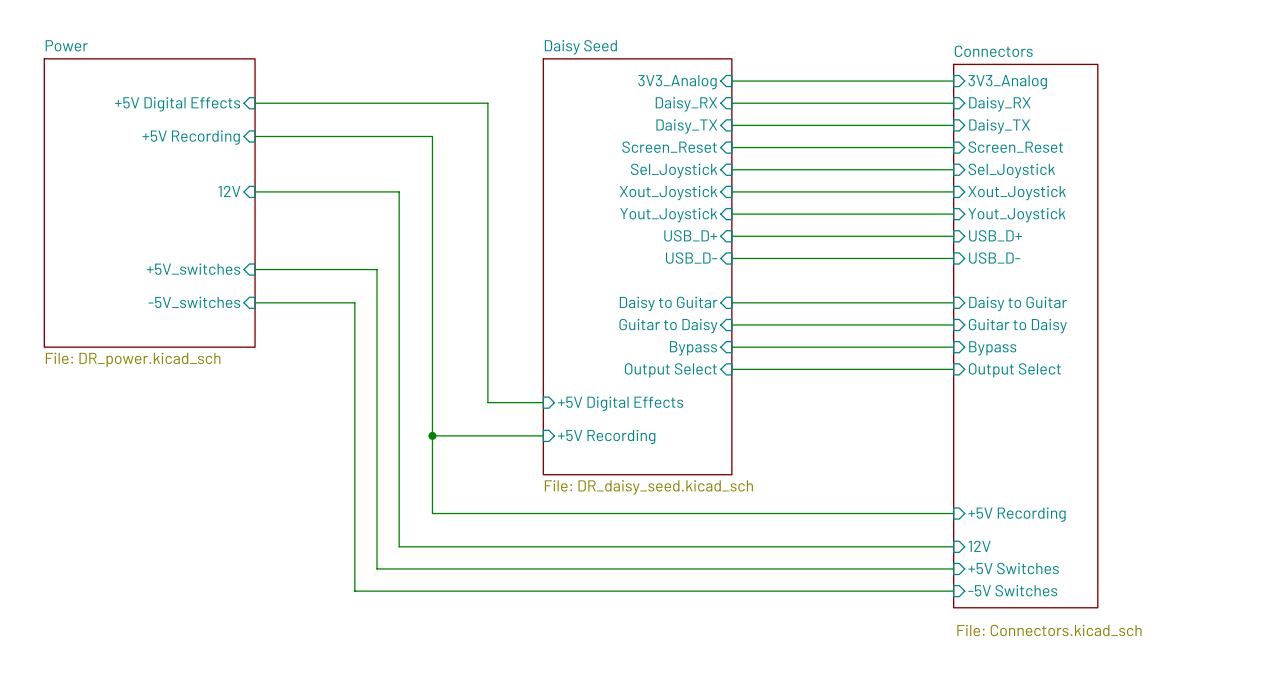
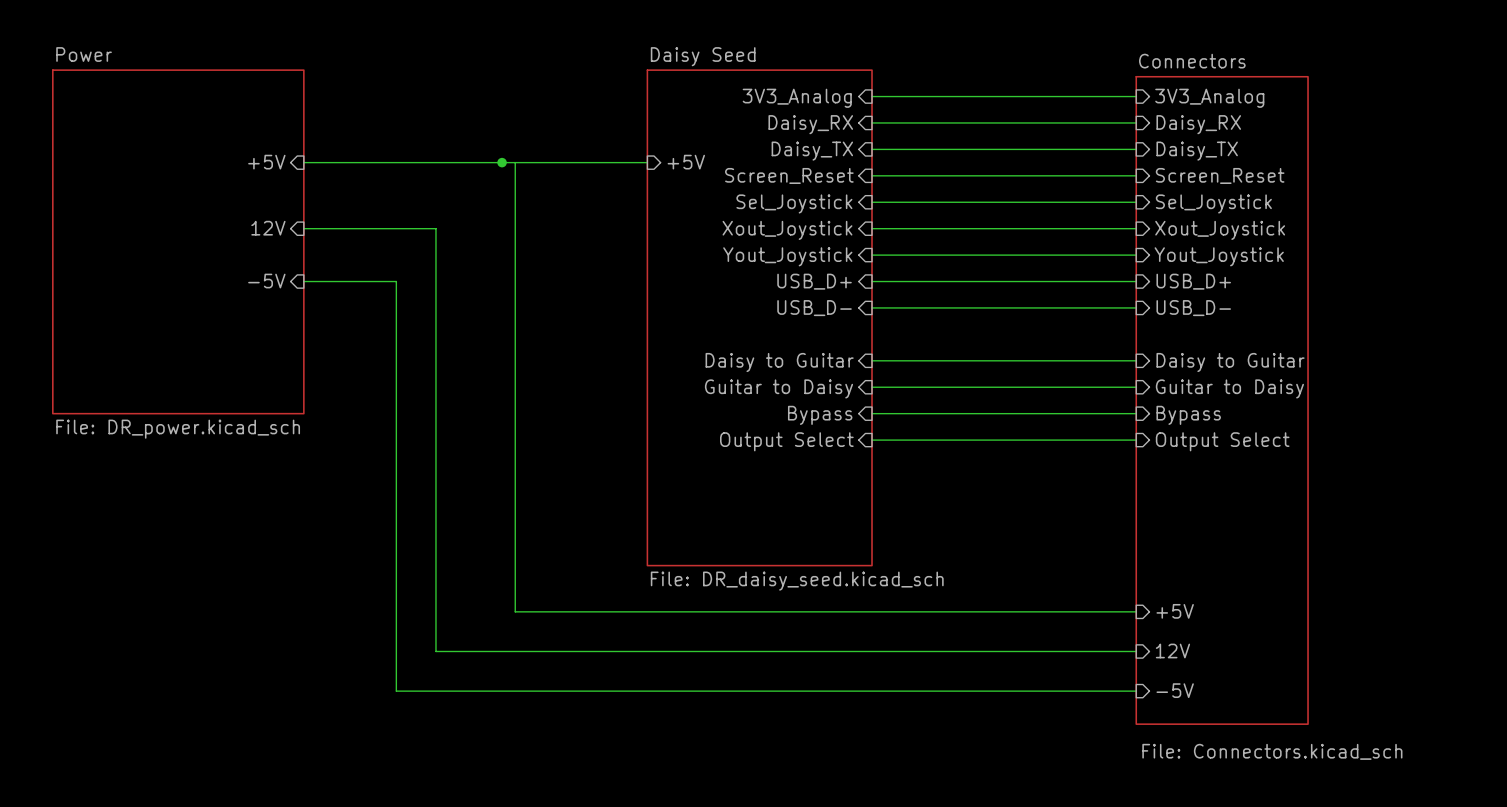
wire: (255, 103) (487, 103) (487, 402) (543, 402) -> none
sheet pin: +5V Digital Effects (177, 104) -> none
junction: none -> (502, 162)
wire: none -> (515, 162) (647, 162)
sheet pin: none -> +5V (686, 162)
sheet pin: +5V Recording (191, 137) -> +5V (266, 162)
wire: (365, 191) (399, 191) (399, 546) -> (435, 228) (435, 651) (475, 651)
sheet pin: none -> -5V (266, 281)
wire: none -> (303, 281) (396, 281) (396, 691) (1136, 691)
sheet pin: +5V_switches (193, 269) -> none
wire: (255, 269) (377, 269) (377, 568) (953, 568) -> none
sheet pin: -5V_switches (194, 302) -> none
wire: (255, 302) (354, 302) (354, 591) (953, 591) -> none
sheet pin: +5V Digital Effects (620, 403) -> none
wire: (432, 435) (543, 435) -> none
junction: (432, 435) -> none
sheet pin: +5V Recording (606, 436) -> none
sheet pin: +5V Recording (1017, 514) -> +5V (1175, 611)
sheet pin: +5V Switches (1013, 568) -> none
sheet pin: none -> -5V (1175, 690)
sheet pin: -5V Switches (1012, 590) -> none

